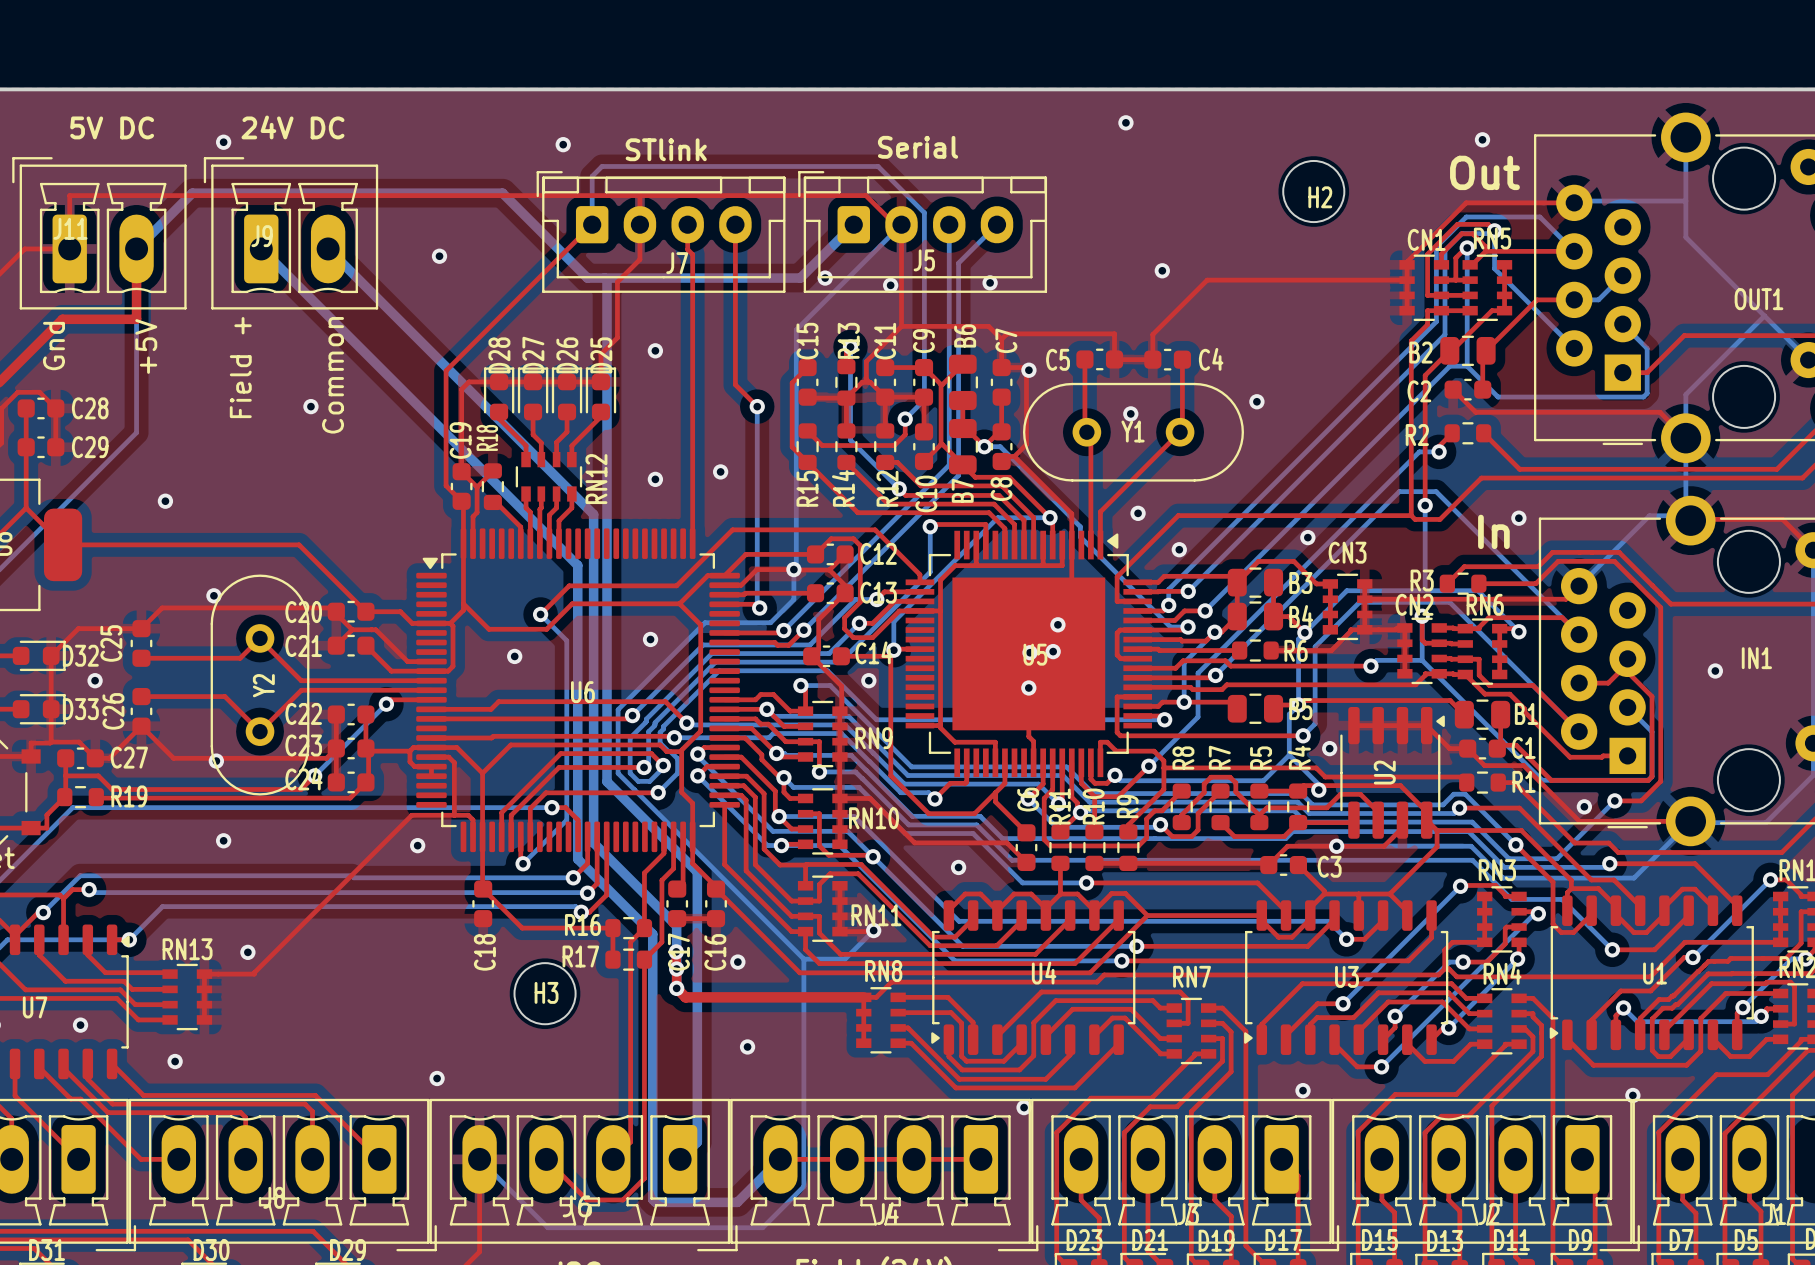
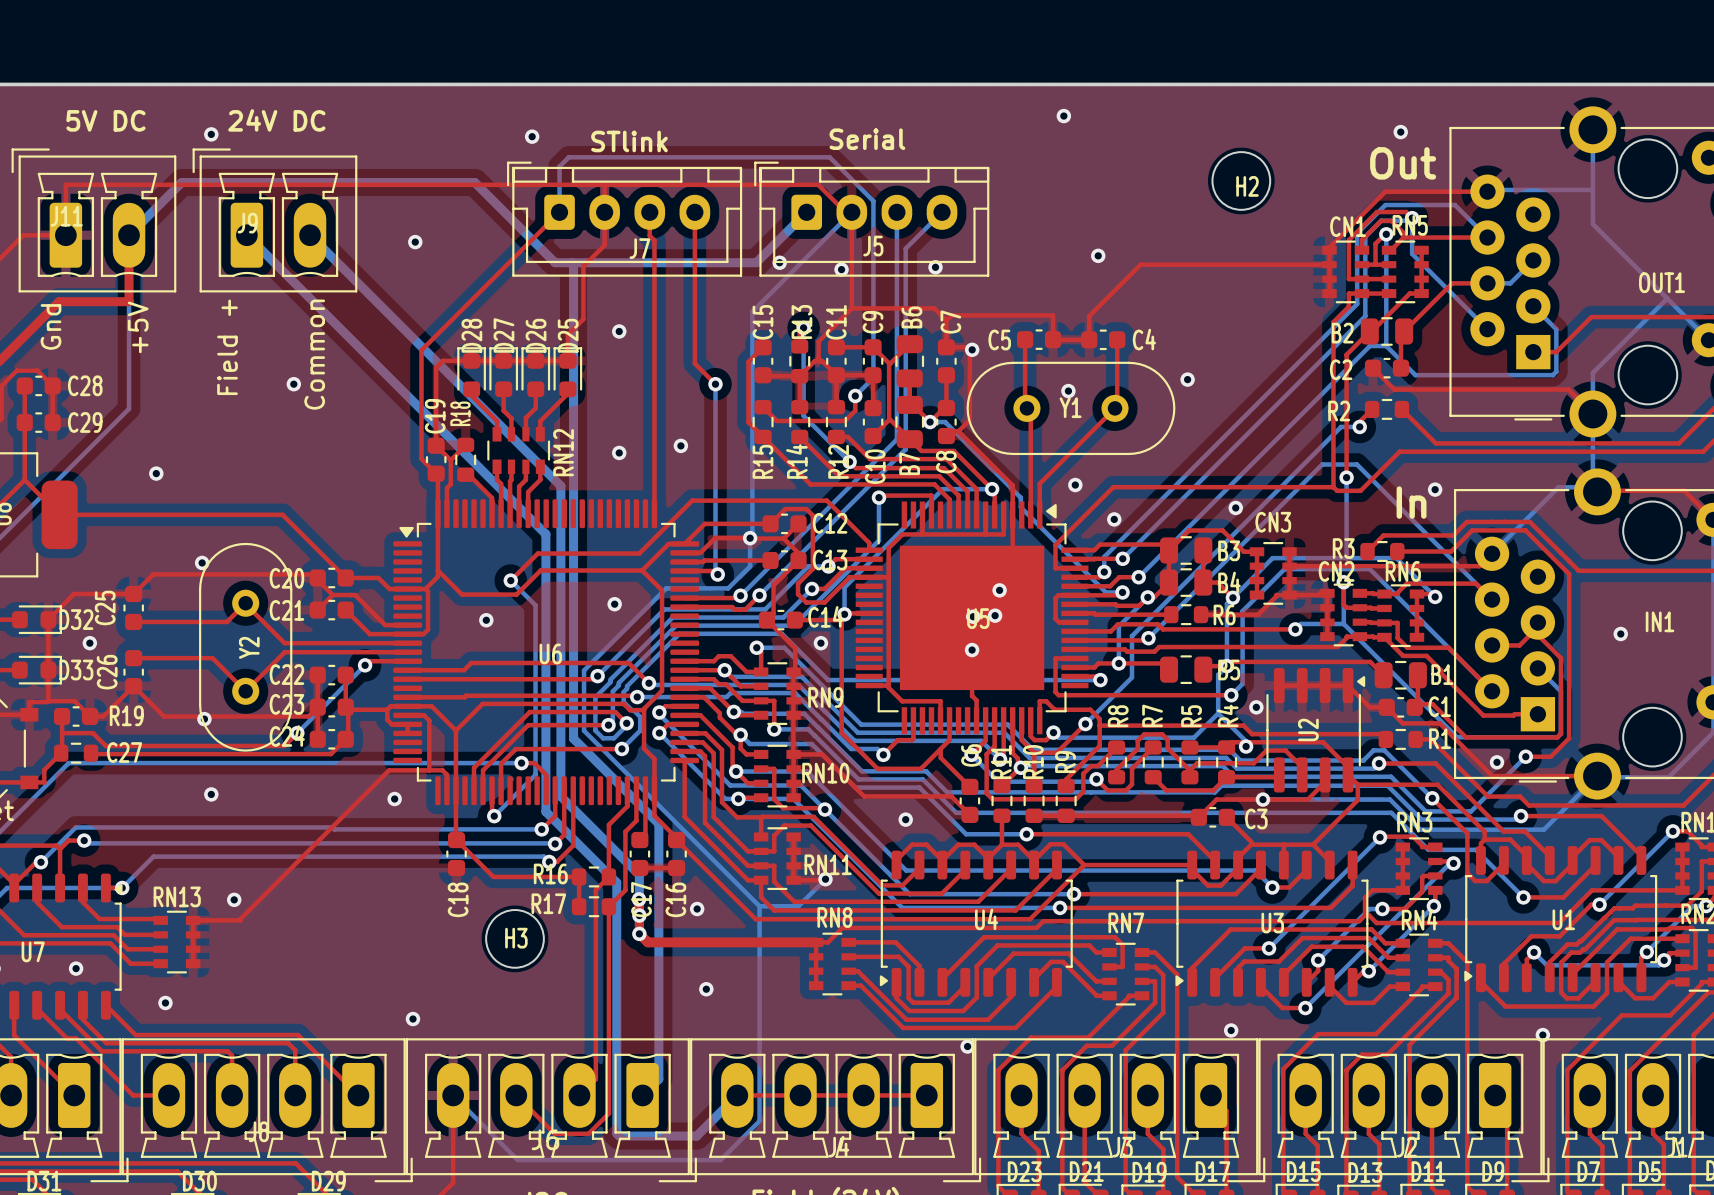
C27 name position: C27 (129, 757) -> C27 (124, 752)
R19 name position: R19 (129, 796) -> R19 (126, 715)

